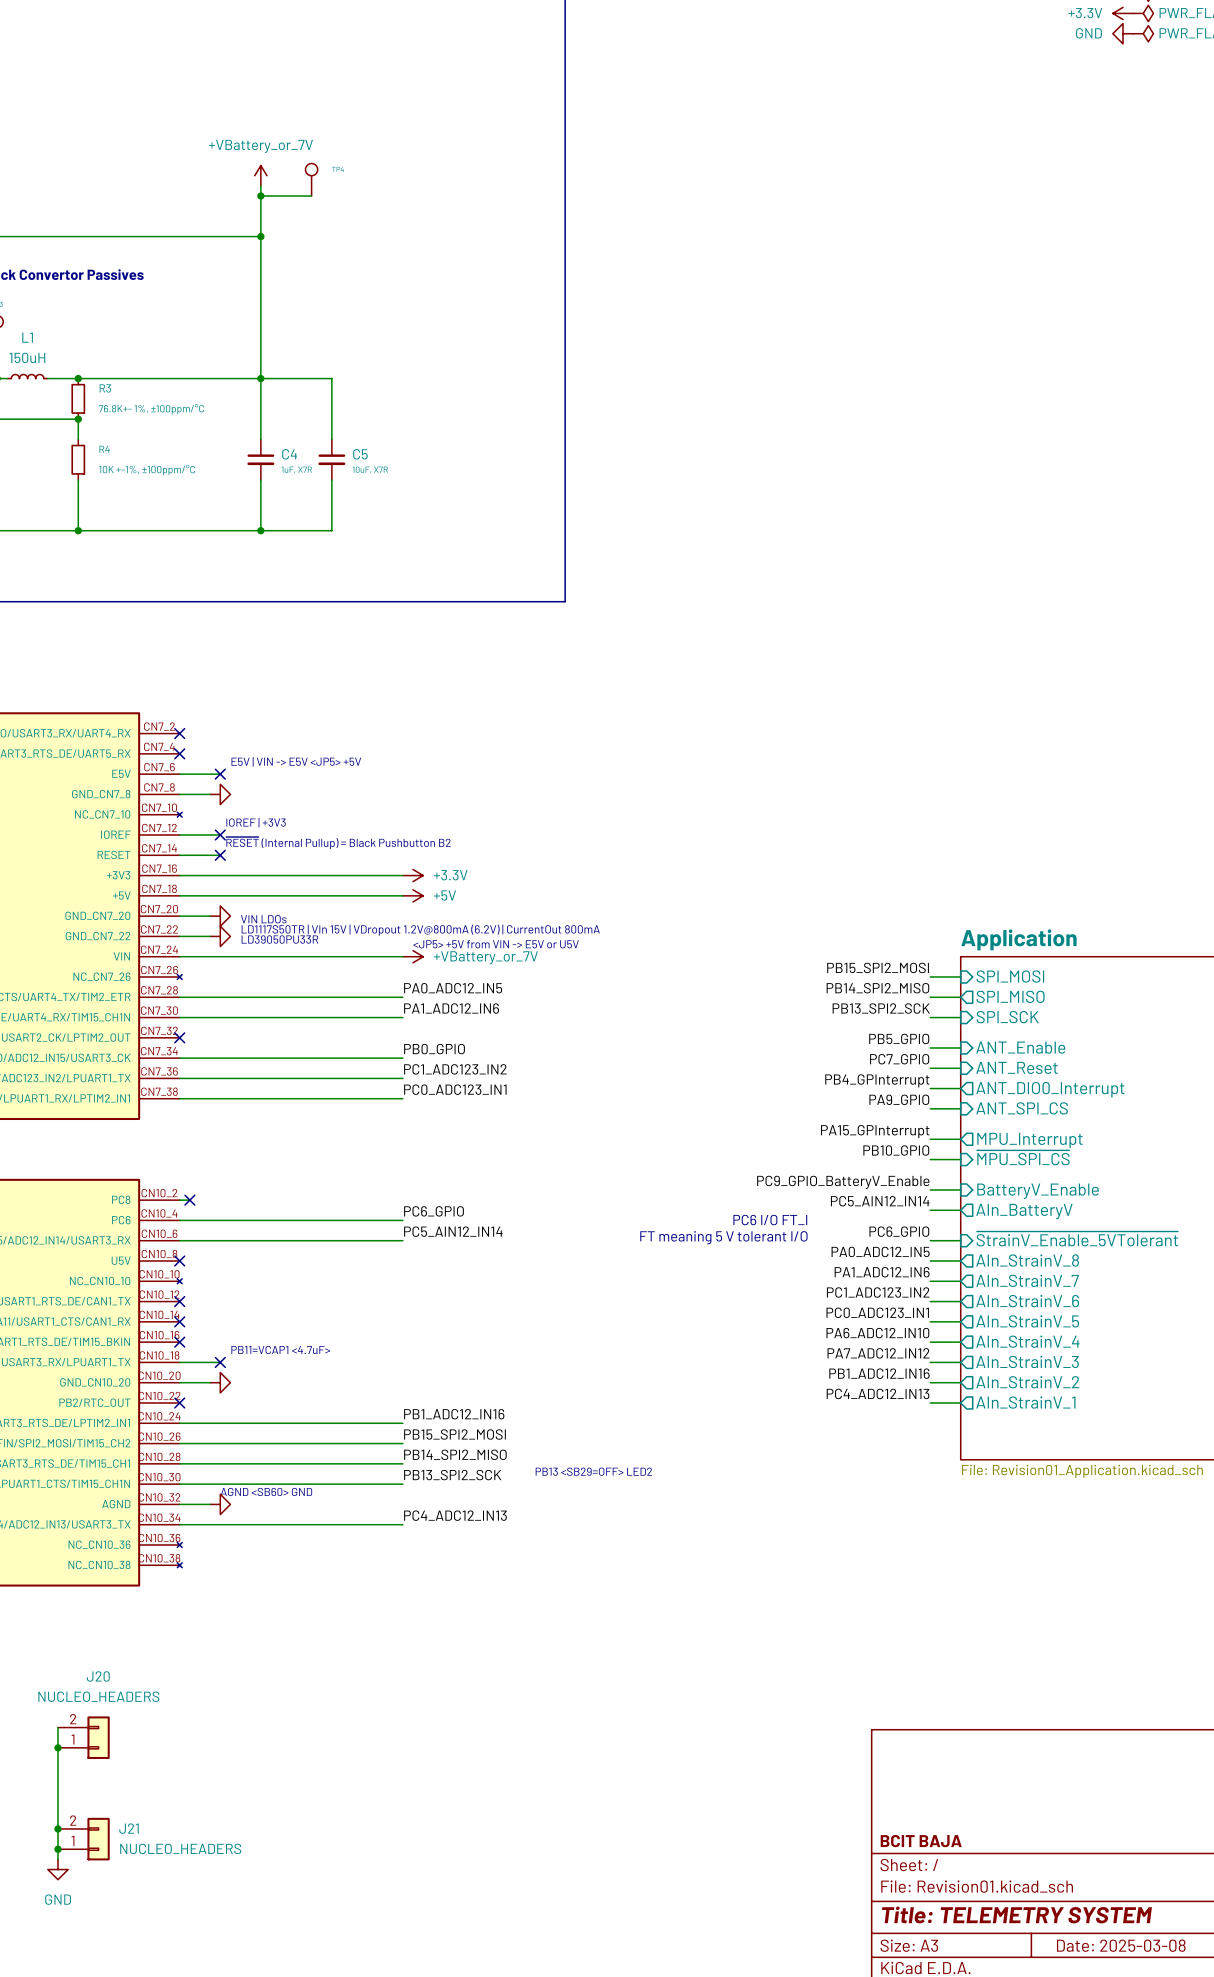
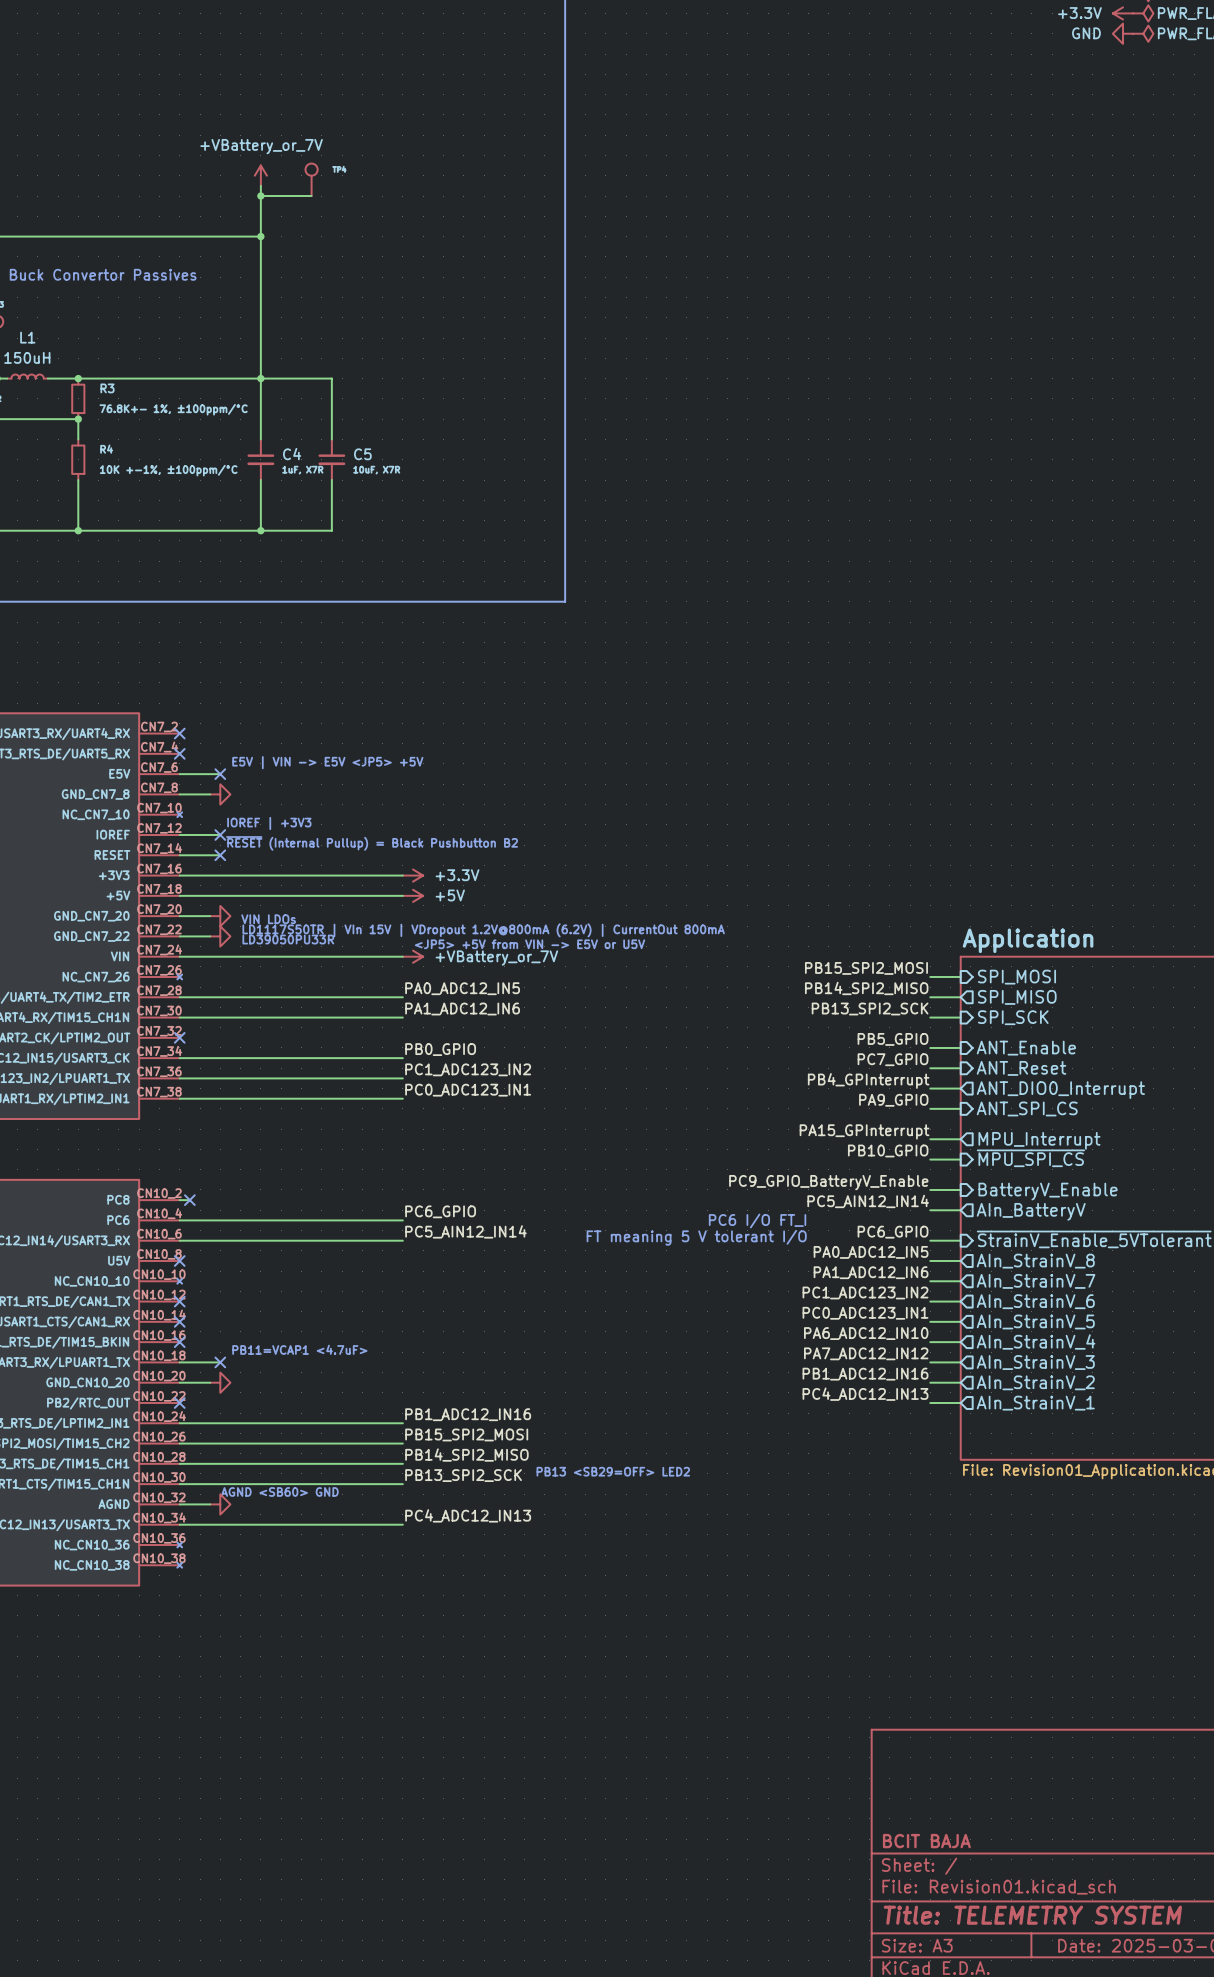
wire: (58, 1727) (58, 1859) -> none
J20: NUCLEO_HEADERS (83, 1737) -> none
junction: (58, 1747) -> none
junction: (58, 1828) -> none
J21: NUCLEO_HEADERS (83, 1839) -> none
junction: (58, 1849) -> none
power symbol: GND (58, 1869) -> none

